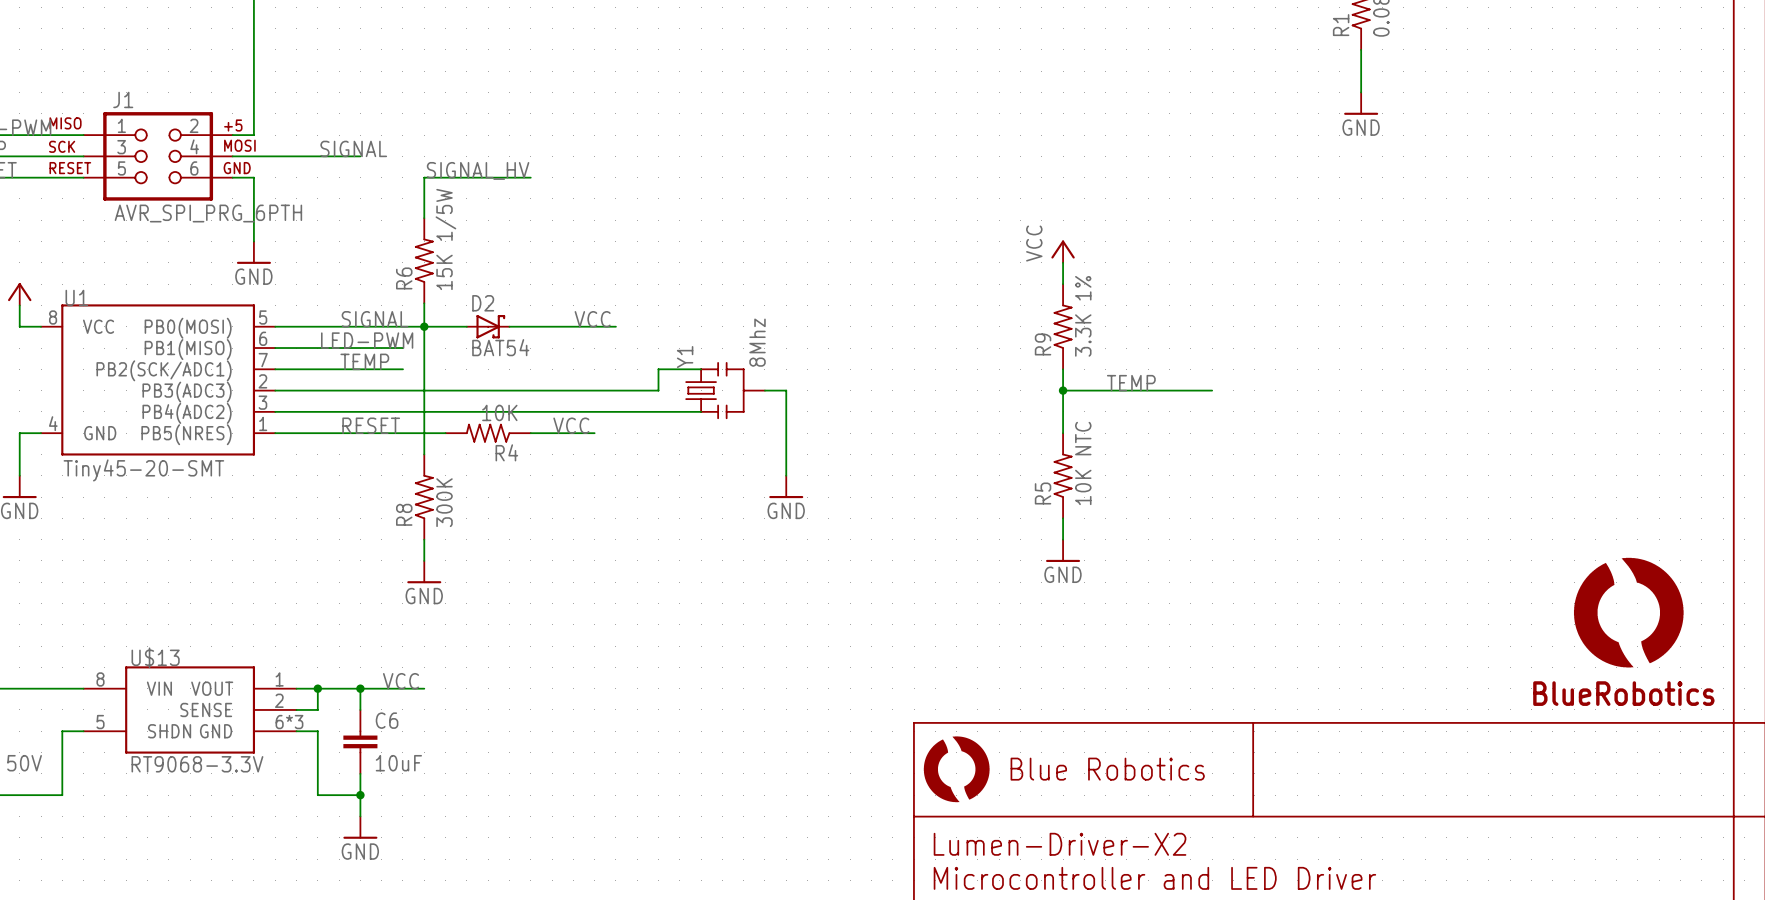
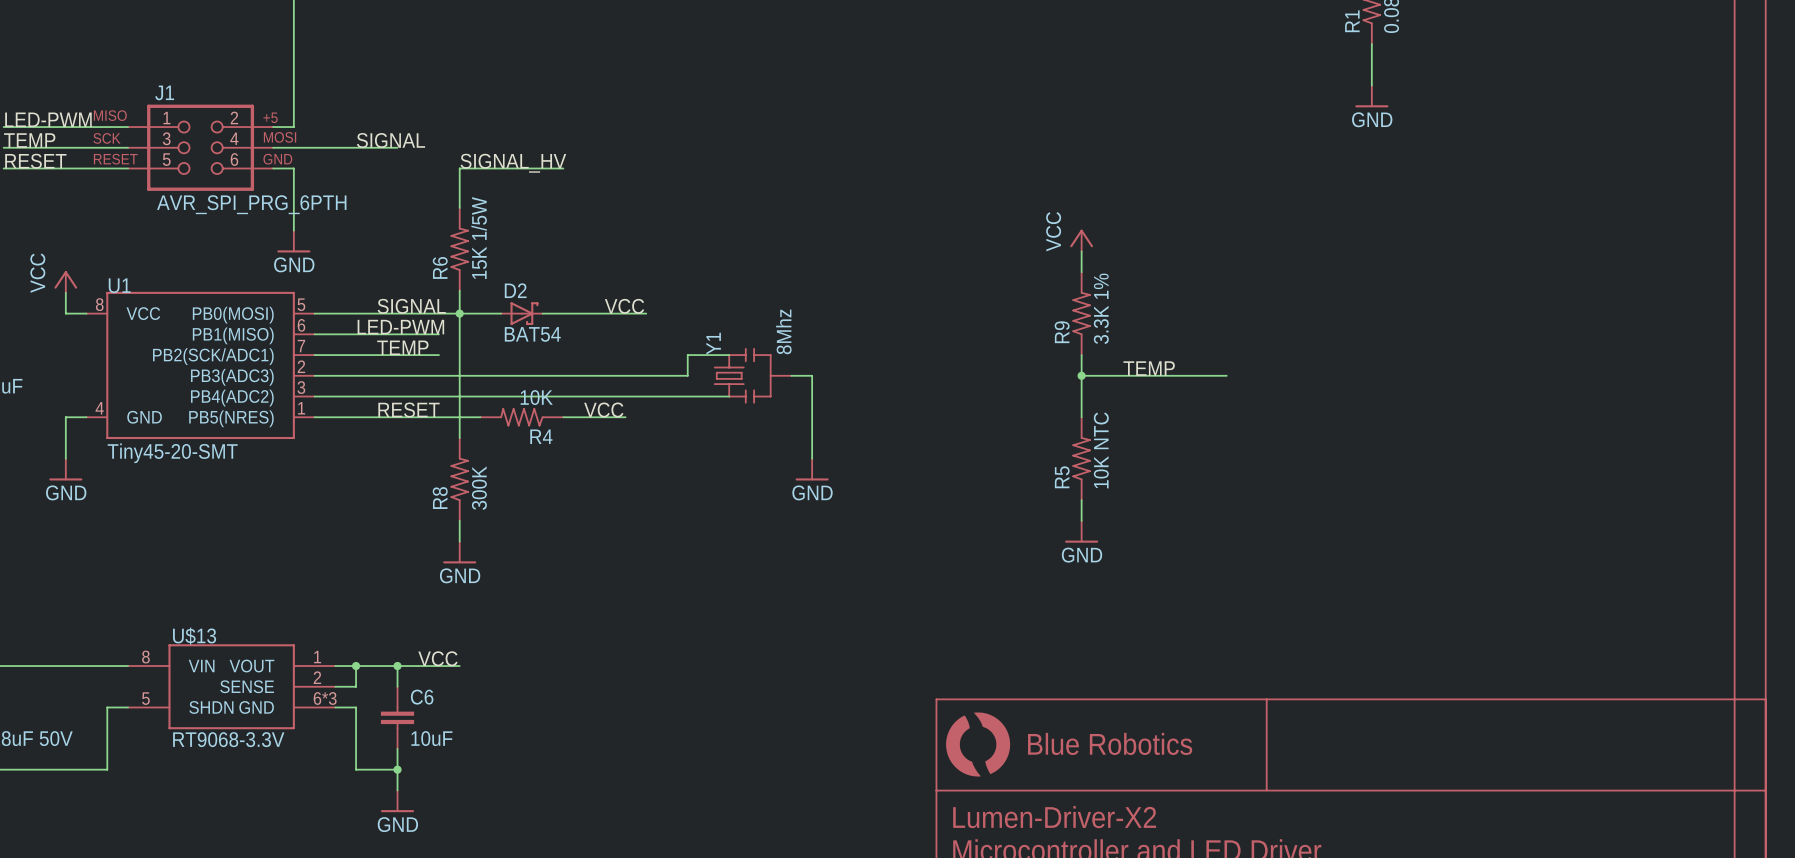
part: (1628, 612) -> none

